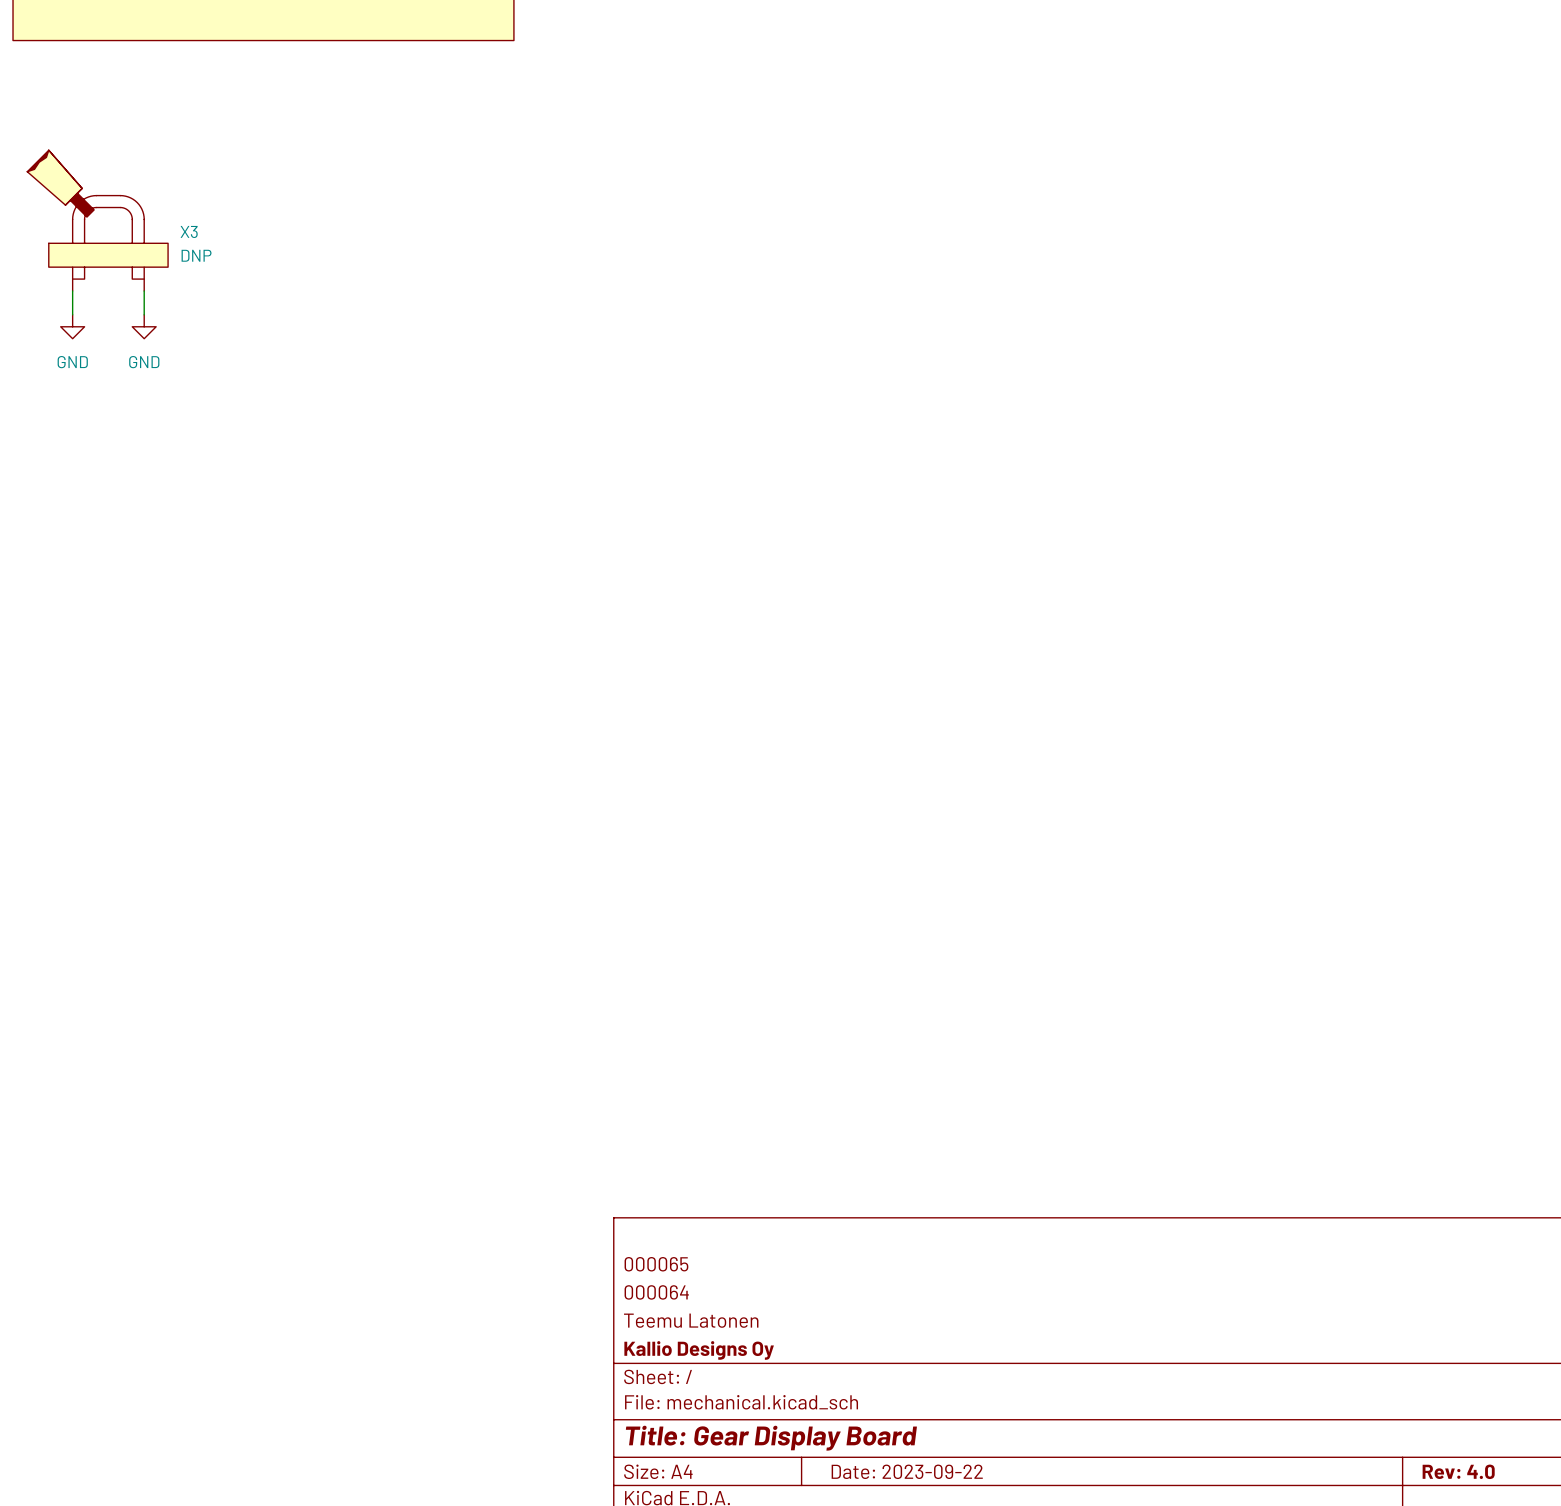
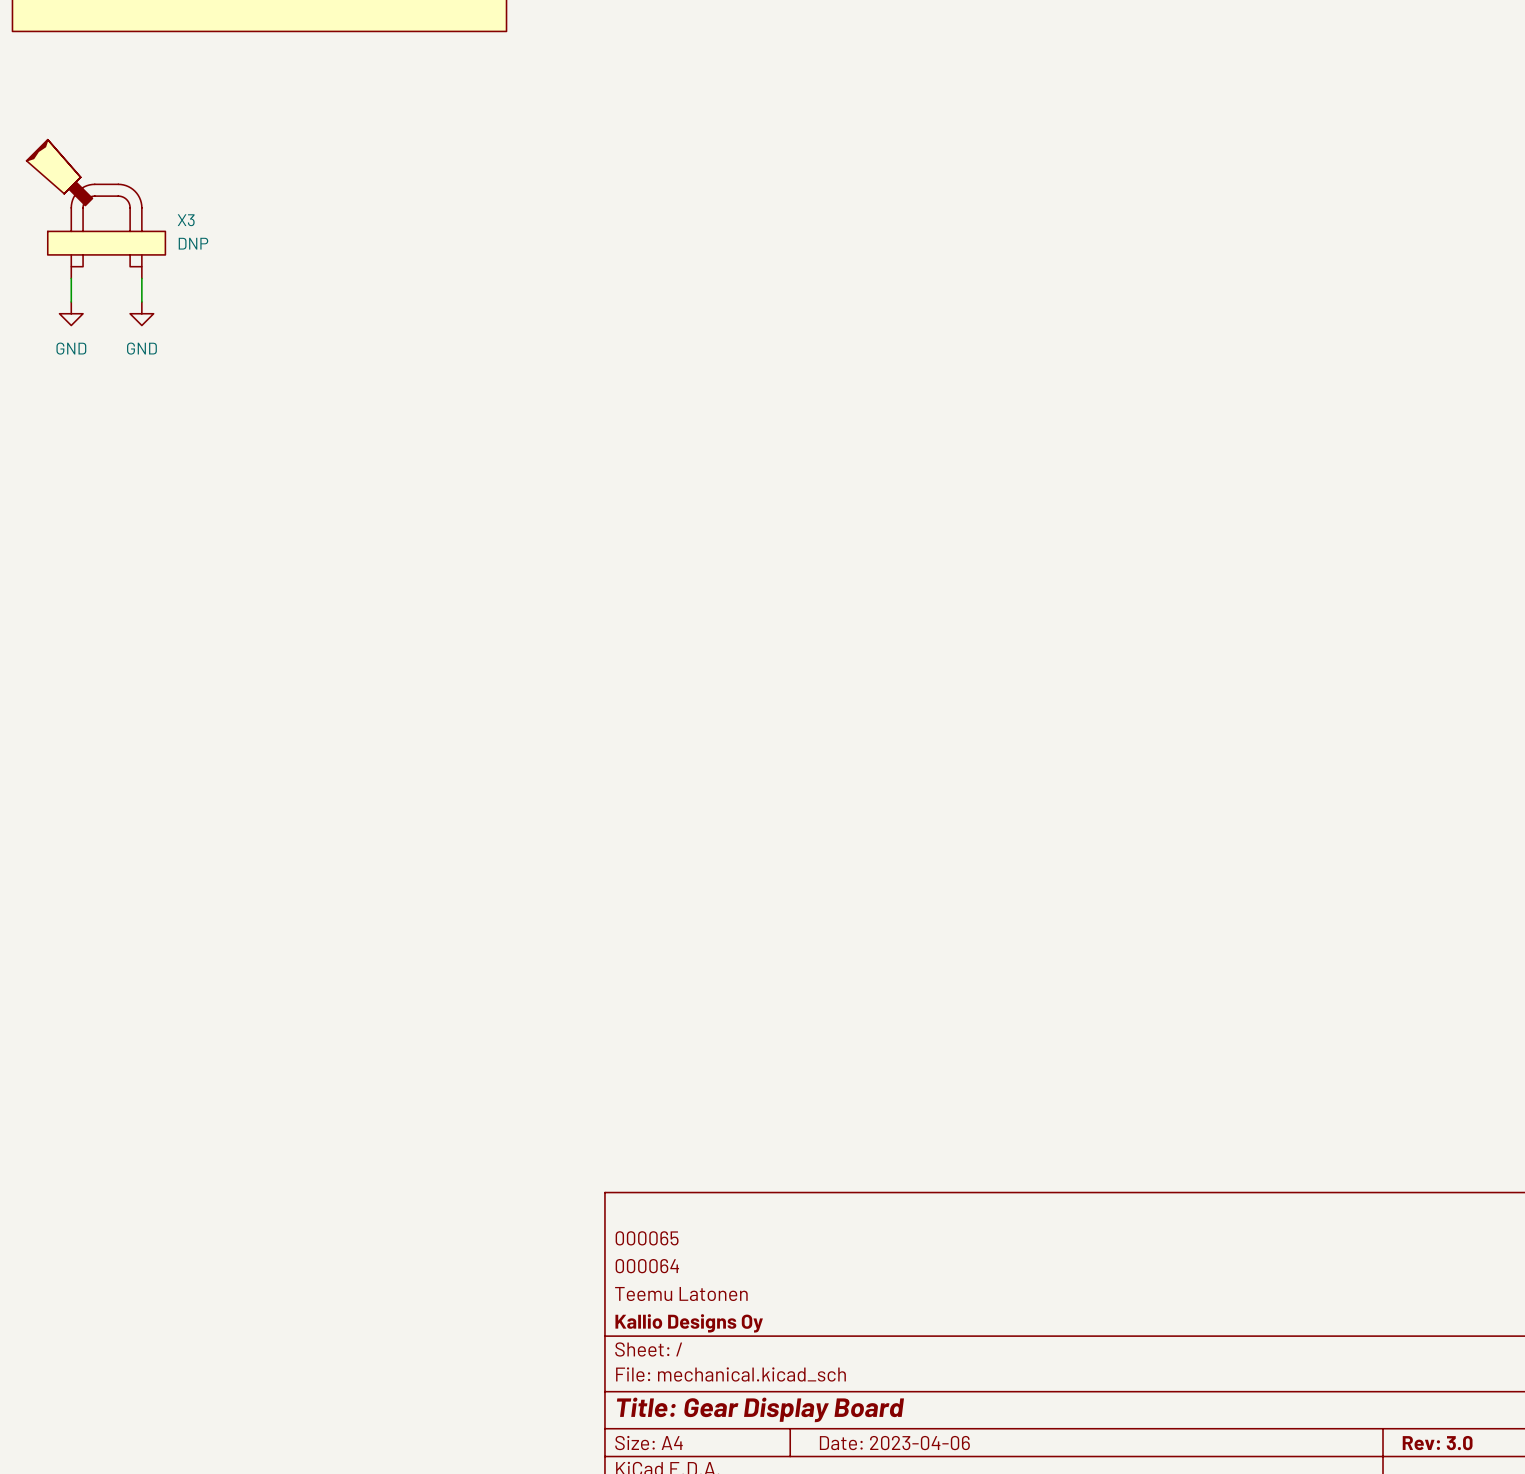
title block: Date: 2023-09-22 (907, 1471) -> Date: 2023-04-06 (894, 1443)
title block: Rev: 4.0 (1458, 1471) -> Rev: 3.0 (1437, 1443)

